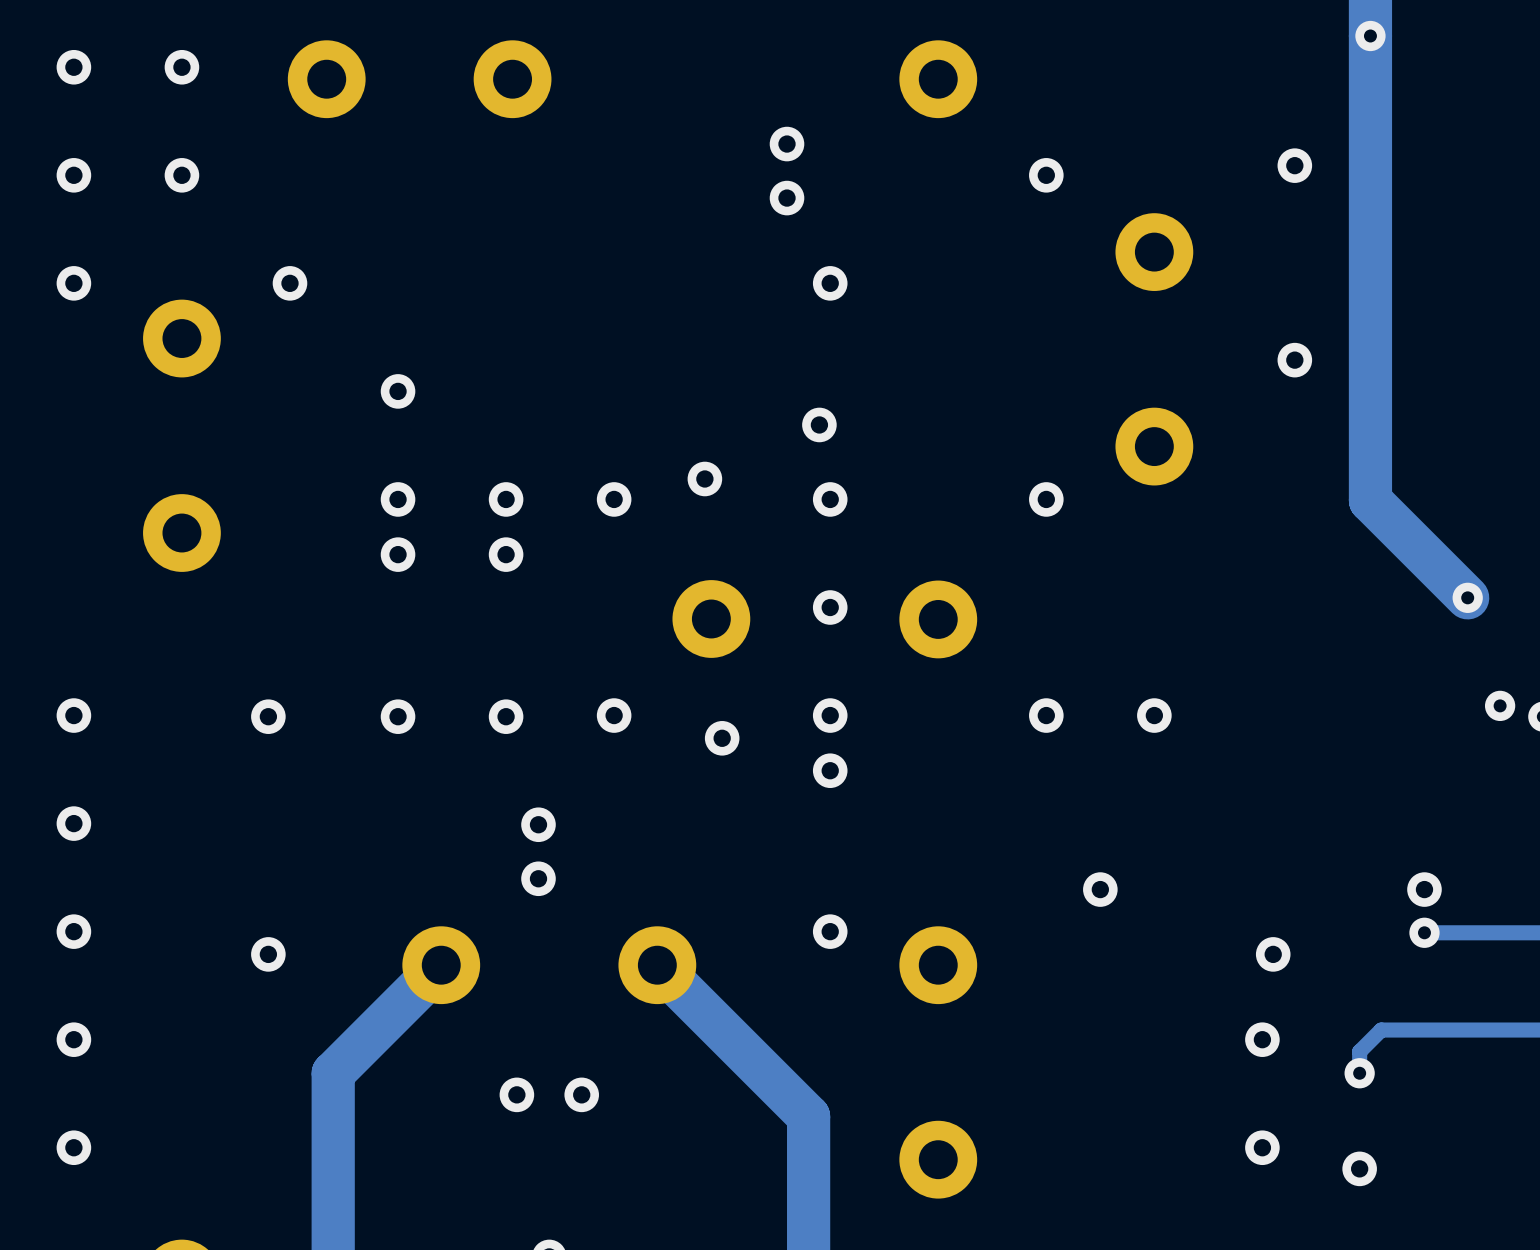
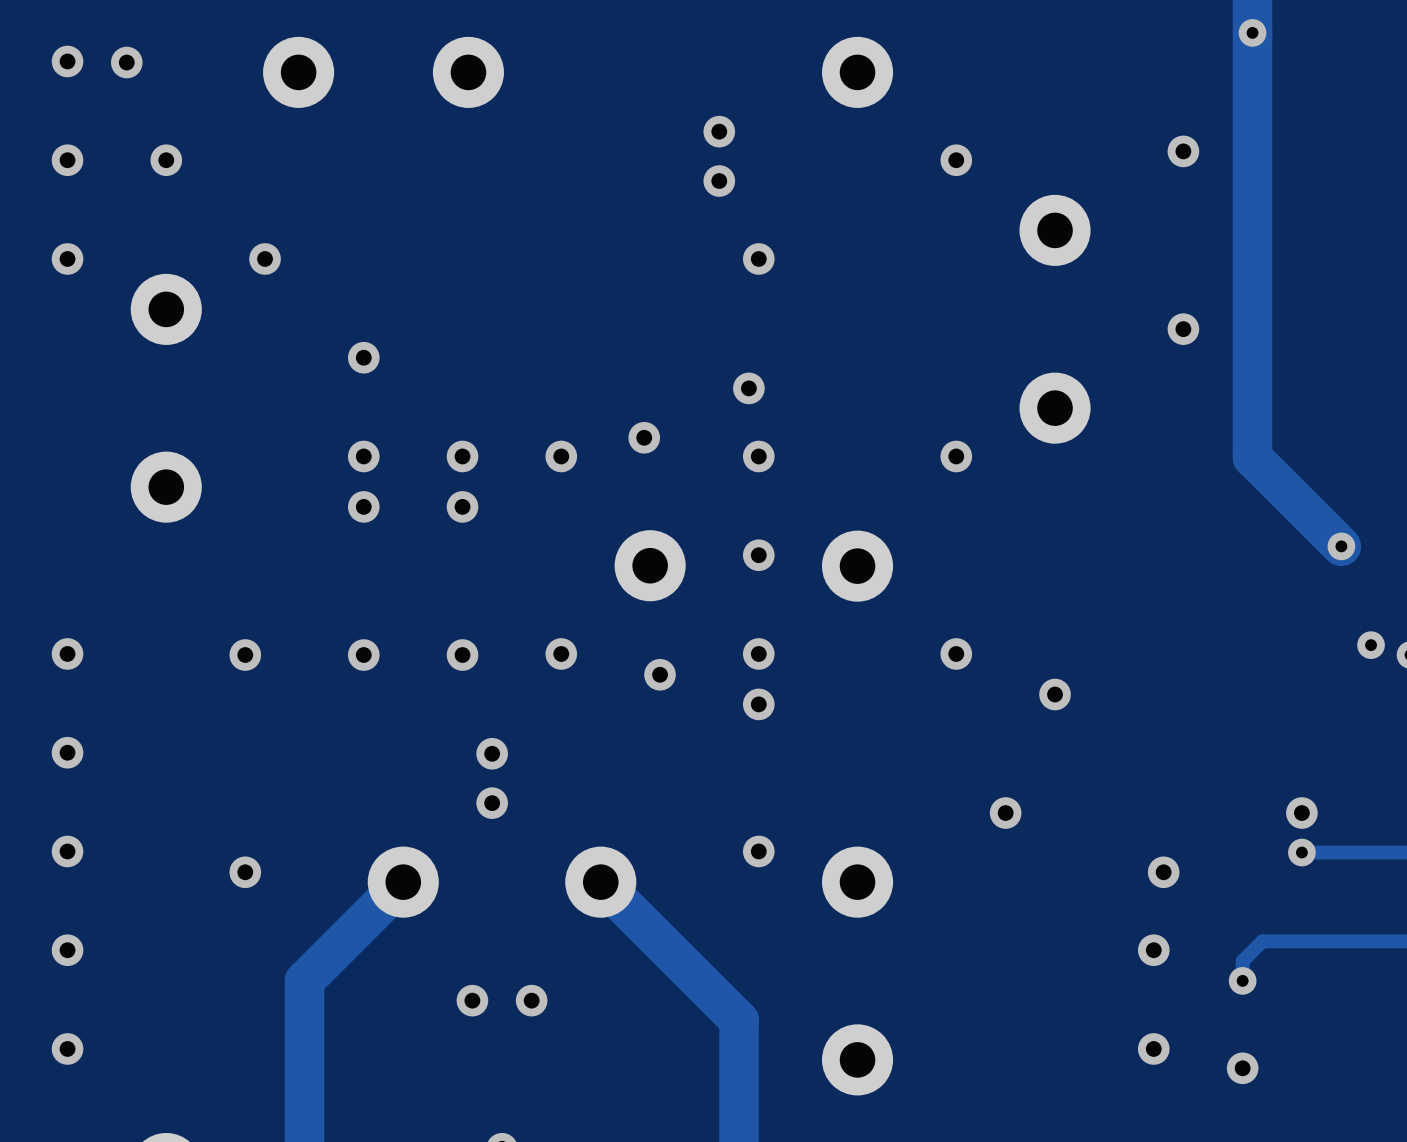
via position: (181, 67) -> (126, 62)
via position: (1154, 715) -> (1055, 694)

